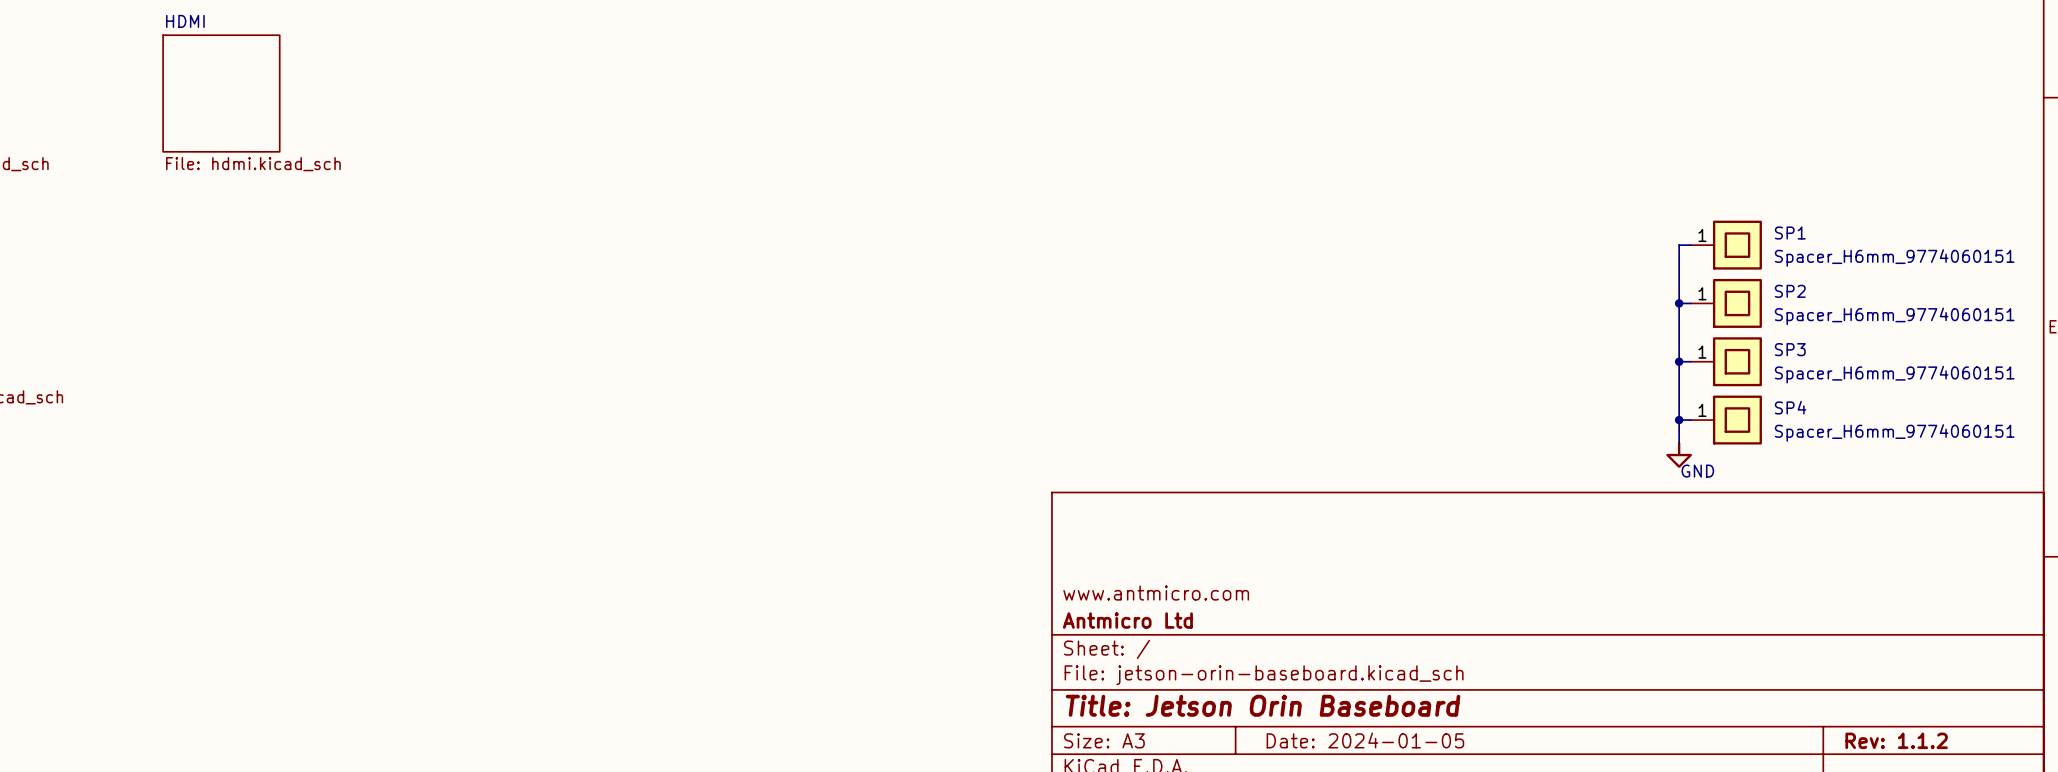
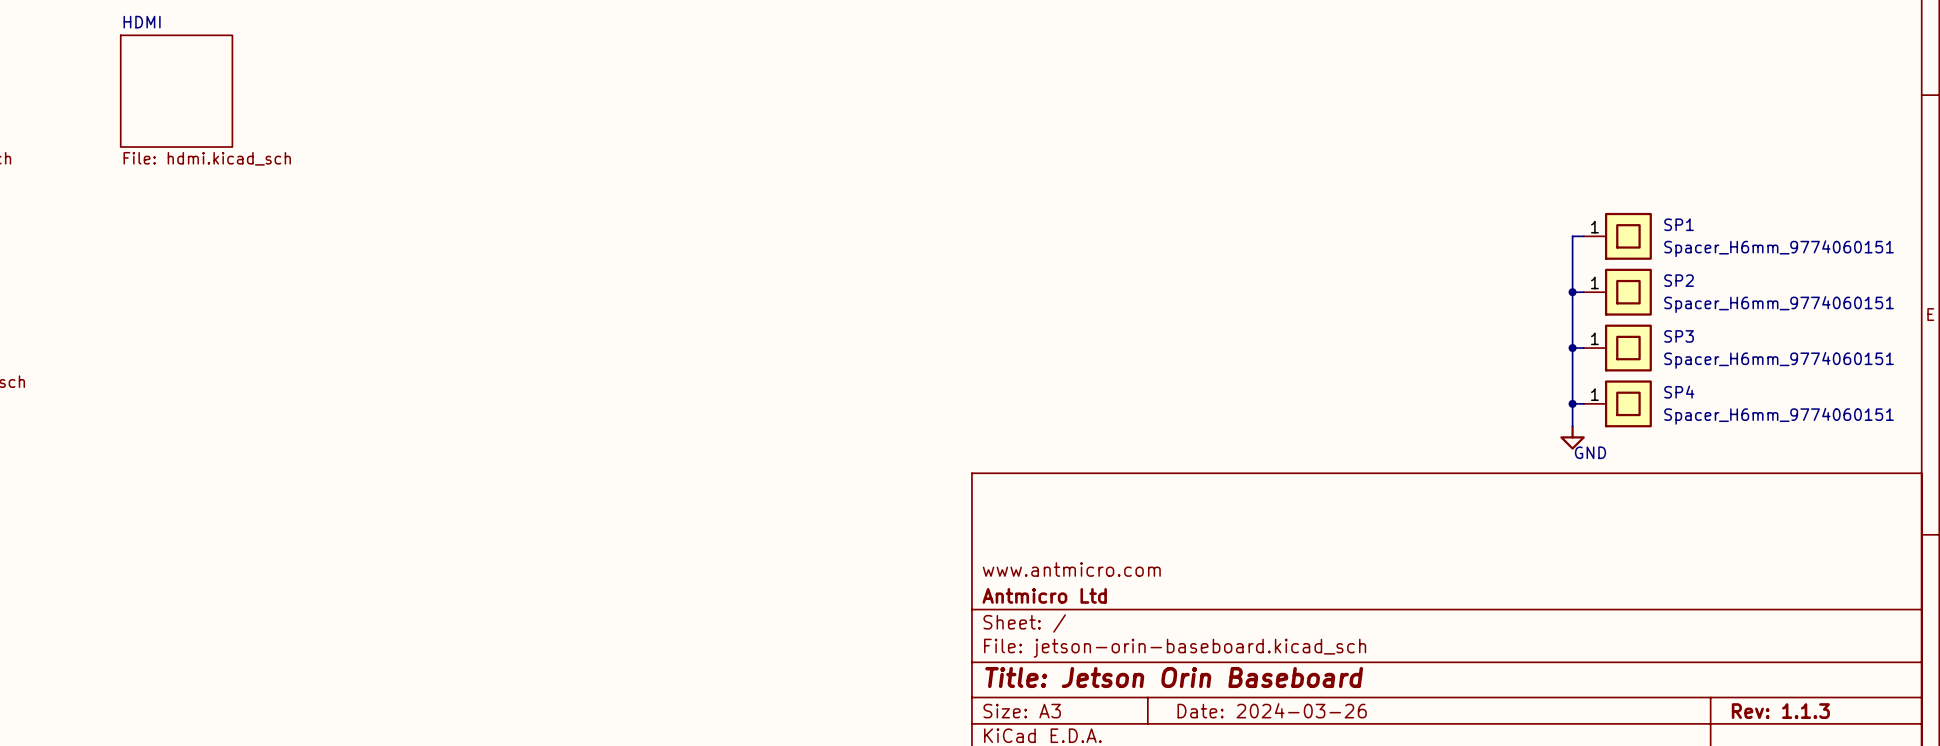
title block: Date: 2024-01-05 (1365, 740) -> Date: 2024-03-26 (1272, 710)
title block: Rev: 1.1.2 (1896, 740) -> Rev: 1.1.3 (1780, 711)

